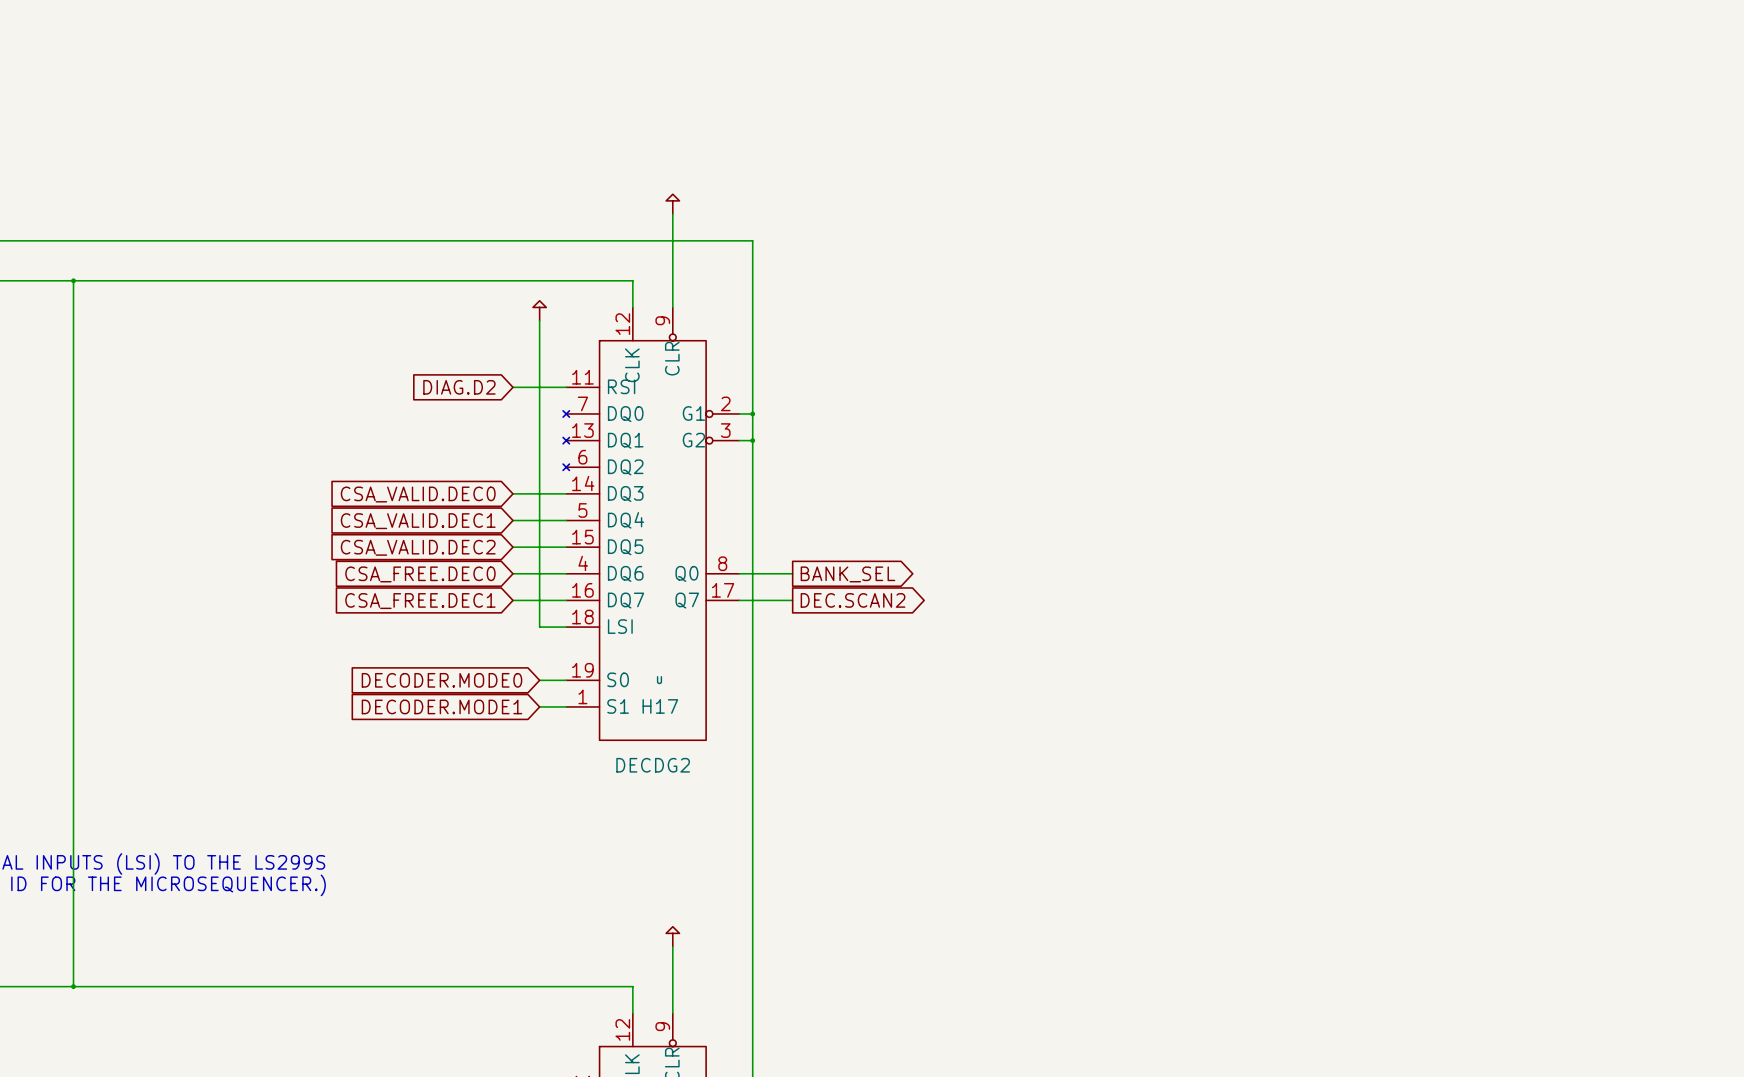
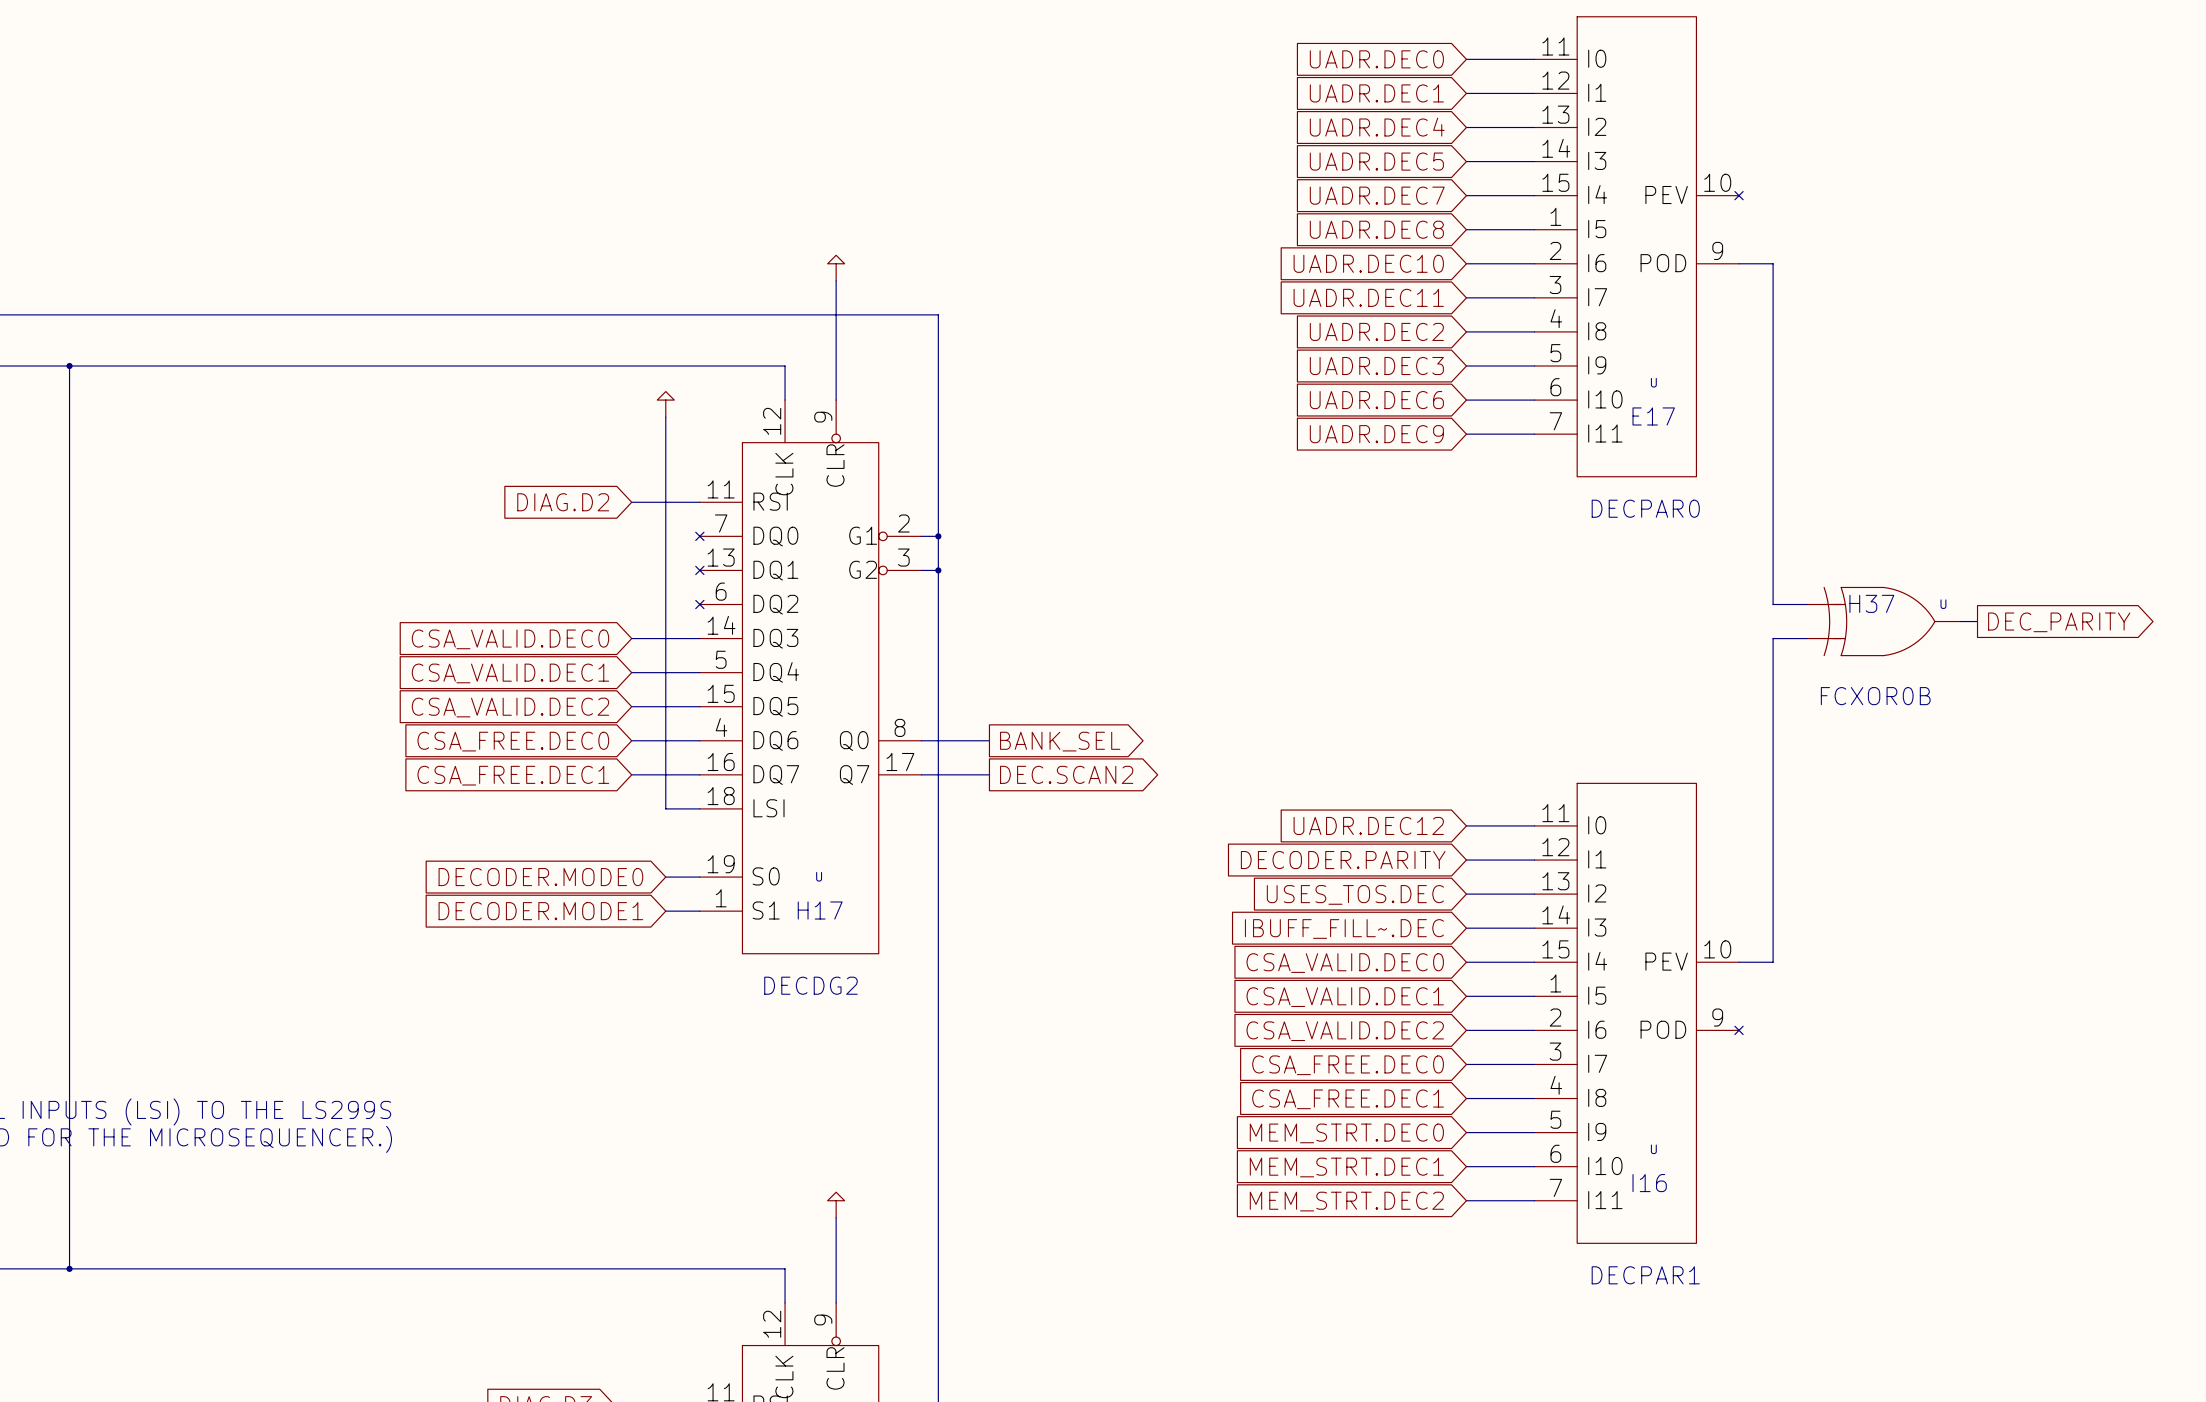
global label: none -> UADR.DEC0 (1376, 59)
wire: none -> (1466, 59) (1534, 59)
global label: none -> UADR.DEC1 (1376, 93)
wire: none -> (1466, 93) (1534, 93)
global label: none -> UADR.DEC4 (1377, 127)
wire: none -> (1466, 127) (1534, 127)
global label: none -> UADR.DEC5 (1376, 161)
wire: none -> (1466, 161) (1534, 161)
global label: none -> UADR.DEC7 (1377, 195)
wire: none -> (1466, 195) (1534, 195)
no-connect mark: none -> (1739, 195)
global label: none -> UADR.DEC8 (1376, 229)
wire: none -> (1466, 229) (1534, 229)
U: none -> (1636, 246)
global label: none -> UADR.DEC10 (1368, 263)
wire: none -> (1466, 263) (1534, 263)
wire: none -> (1739, 263) (1773, 263) (1773, 604) (1807, 604)
global label: none -> UADR.DEC11 (1368, 297)
wire: none -> (1466, 297) (1534, 297)
global label: none -> UADR.DEC2 (1376, 331)
wire: none -> (1466, 331) (1534, 331)
global label: none -> UADR.DEC3 (1376, 366)
wire: none -> (1466, 366) (1534, 366)
global label: none -> UADR.DEC6 (1376, 400)
wire: none -> (1466, 400) (1534, 400)
global label: none -> UADR.DEC9 (1376, 434)
wire: none -> (1466, 434) (1534, 434)
U: none -> (1883, 621)
wire: none -> (1960, 621) (1977, 621)
global label: none -> DEC_PARITY (2059, 622)
wire: none -> (1807, 638) (1773, 638) (1773, 962) (1739, 962)
global label: none -> UADR.DEC12 (1368, 825)
wire: none -> (1466, 825) (1534, 825)
global label: none -> DECODER.PARITY (1343, 860)
wire: none -> (1466, 860) (1534, 860)
wire: none -> (1466, 894) (1534, 894)
global label: none -> USES_TOS.DEC (1355, 894)
global label: none -> IBUFF_FILL~.DEC (1344, 928)
wire: none -> (1466, 928) (1534, 928)
wire: none -> (1466, 962) (1534, 962)
global label: none -> CSA_VALID.DEC0 (1345, 963)
wire: none -> (1466, 996) (1534, 996)
global label: none -> CSA_VALID.DEC1 (1345, 997)
U: none -> (1636, 1013)
global label: none -> CSA_VALID.DEC2 (1345, 1031)
wire: none -> (1466, 1030) (1534, 1030)
no-connect mark: none -> (1739, 1030)
wire: none -> (1466, 1064) (1534, 1064)
global label: none -> CSA_FREE.DEC0 (1348, 1065)
wire: none -> (1466, 1098) (1534, 1098)
global label: none -> CSA_FREE.DEC1 (1348, 1099)
global label: none -> MEM_STRT.DEC0 (1346, 1133)
wire: none -> (1466, 1132) (1534, 1132)
wire: none -> (1466, 1166) (1534, 1166)
global label: none -> MEM_STRT.DEC1 (1346, 1167)
wire: none -> (1466, 1200) (1534, 1200)
global label: none -> MEM_STRT.DEC2 (1346, 1201)

